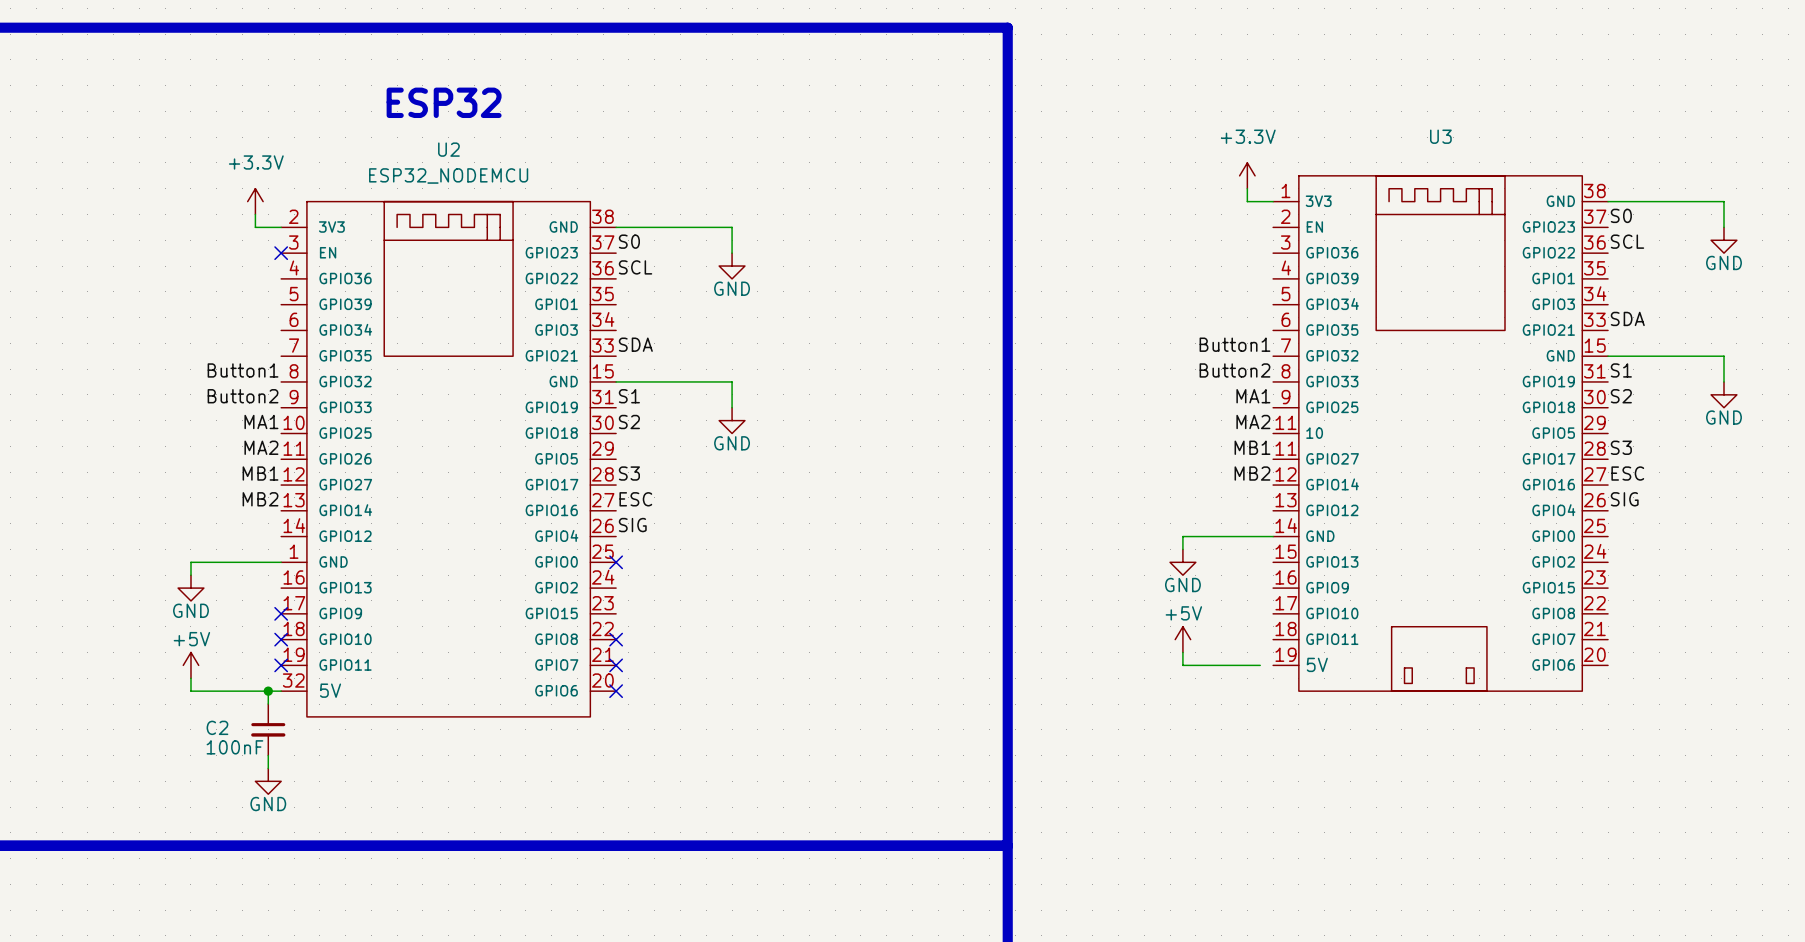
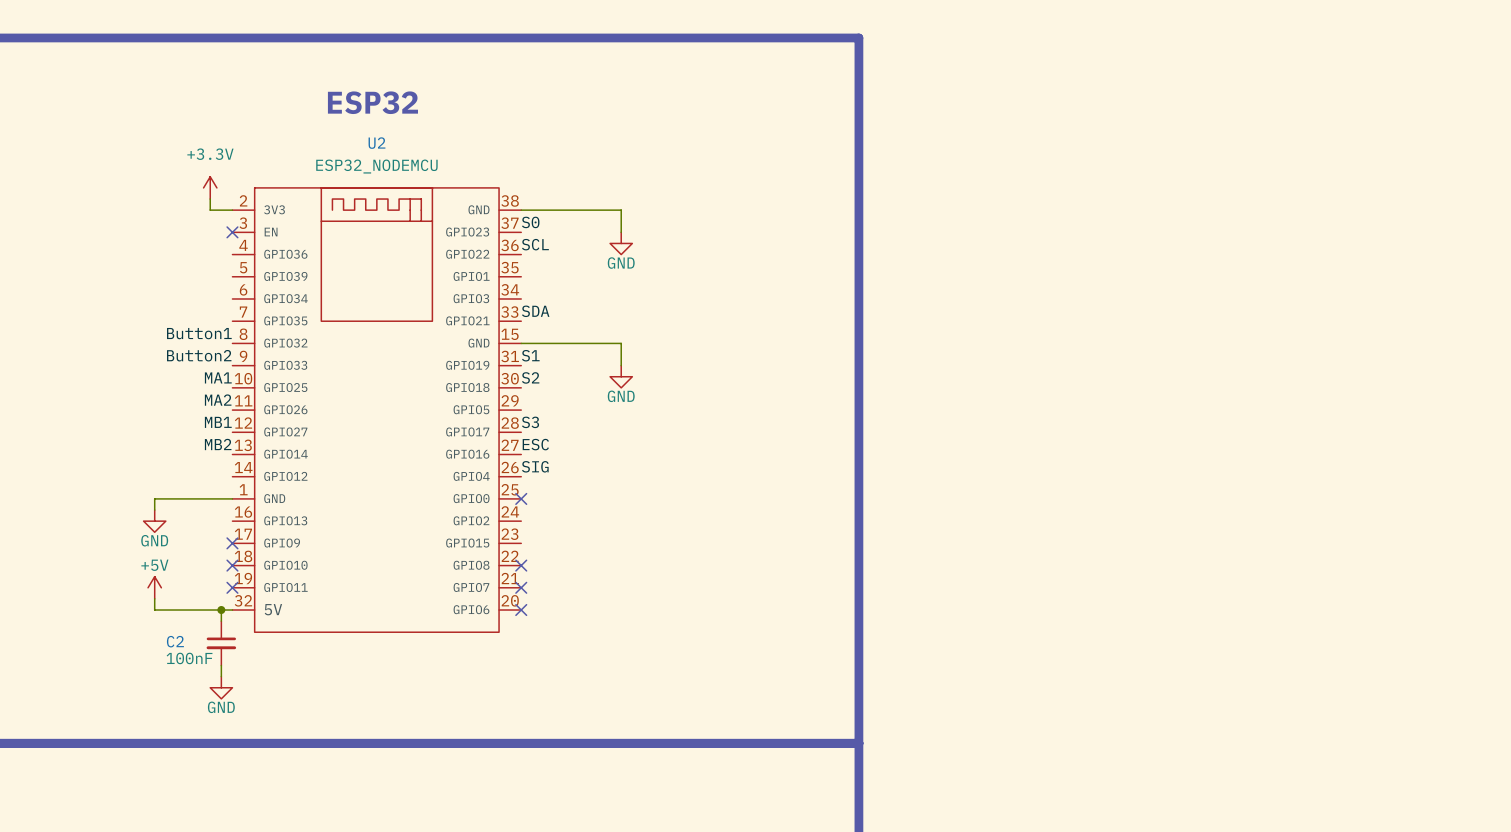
power symbol: +3.3V (1247, 175) -> none
wire: (1247, 188) (1247, 201) (1273, 201) -> none
wire: (1608, 201) (1723, 201) (1723, 227) -> none
label: S0 (1621, 215) -> none
power symbol: GND (1723, 240) -> none
label: SCL (1627, 241) -> none
label: SDA (1627, 318) -> none
label: Button1 (1234, 344) -> none
wire: (1608, 356) (1723, 356) (1723, 381) -> none
label: Button2 (1234, 370) -> none
label: S1 (1621, 370) -> none
power symbol: GND (1723, 394) -> none
label: MA1 (1253, 396) -> none
label: S2 (1621, 396) -> none
label: MA2 (1253, 422) -> none
U3: (1440, 433) -> none
label: MB1 (1252, 447) -> none
label: S3 (1621, 447) -> none
label: MB2 (1252, 473) -> none
label: ESC (1627, 473) -> none
label: SIG (1624, 499) -> none
wire: (1273, 536) (1182, 536) (1182, 549) -> none
power symbol: GND (1182, 562) -> none
power symbol: +5V (1182, 639) -> none
wire: (1182, 652) (1182, 665) (1260, 665) -> none

